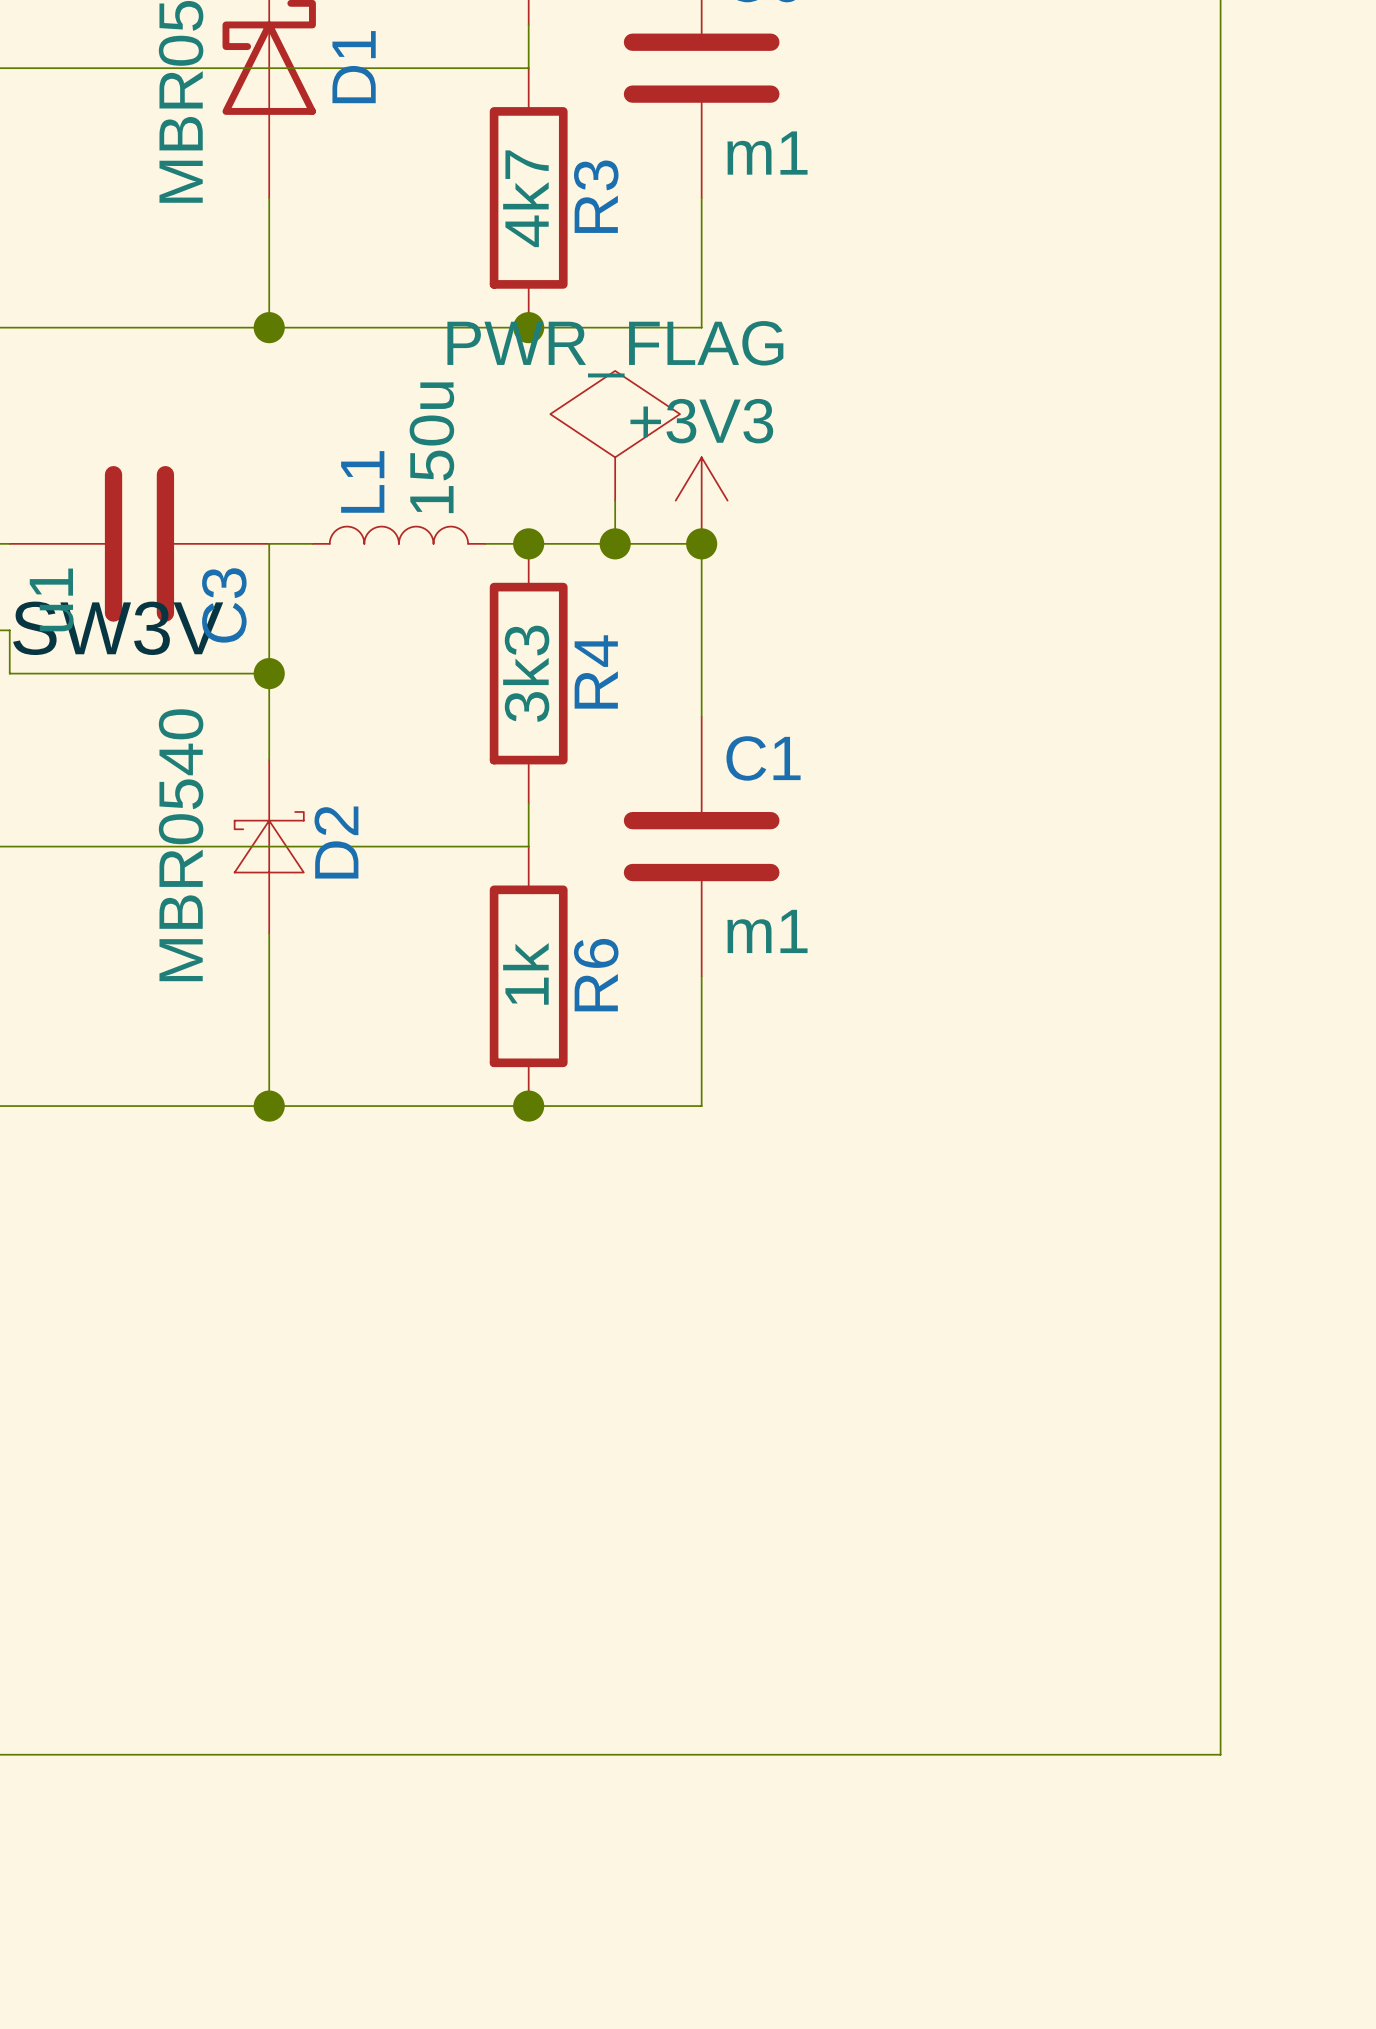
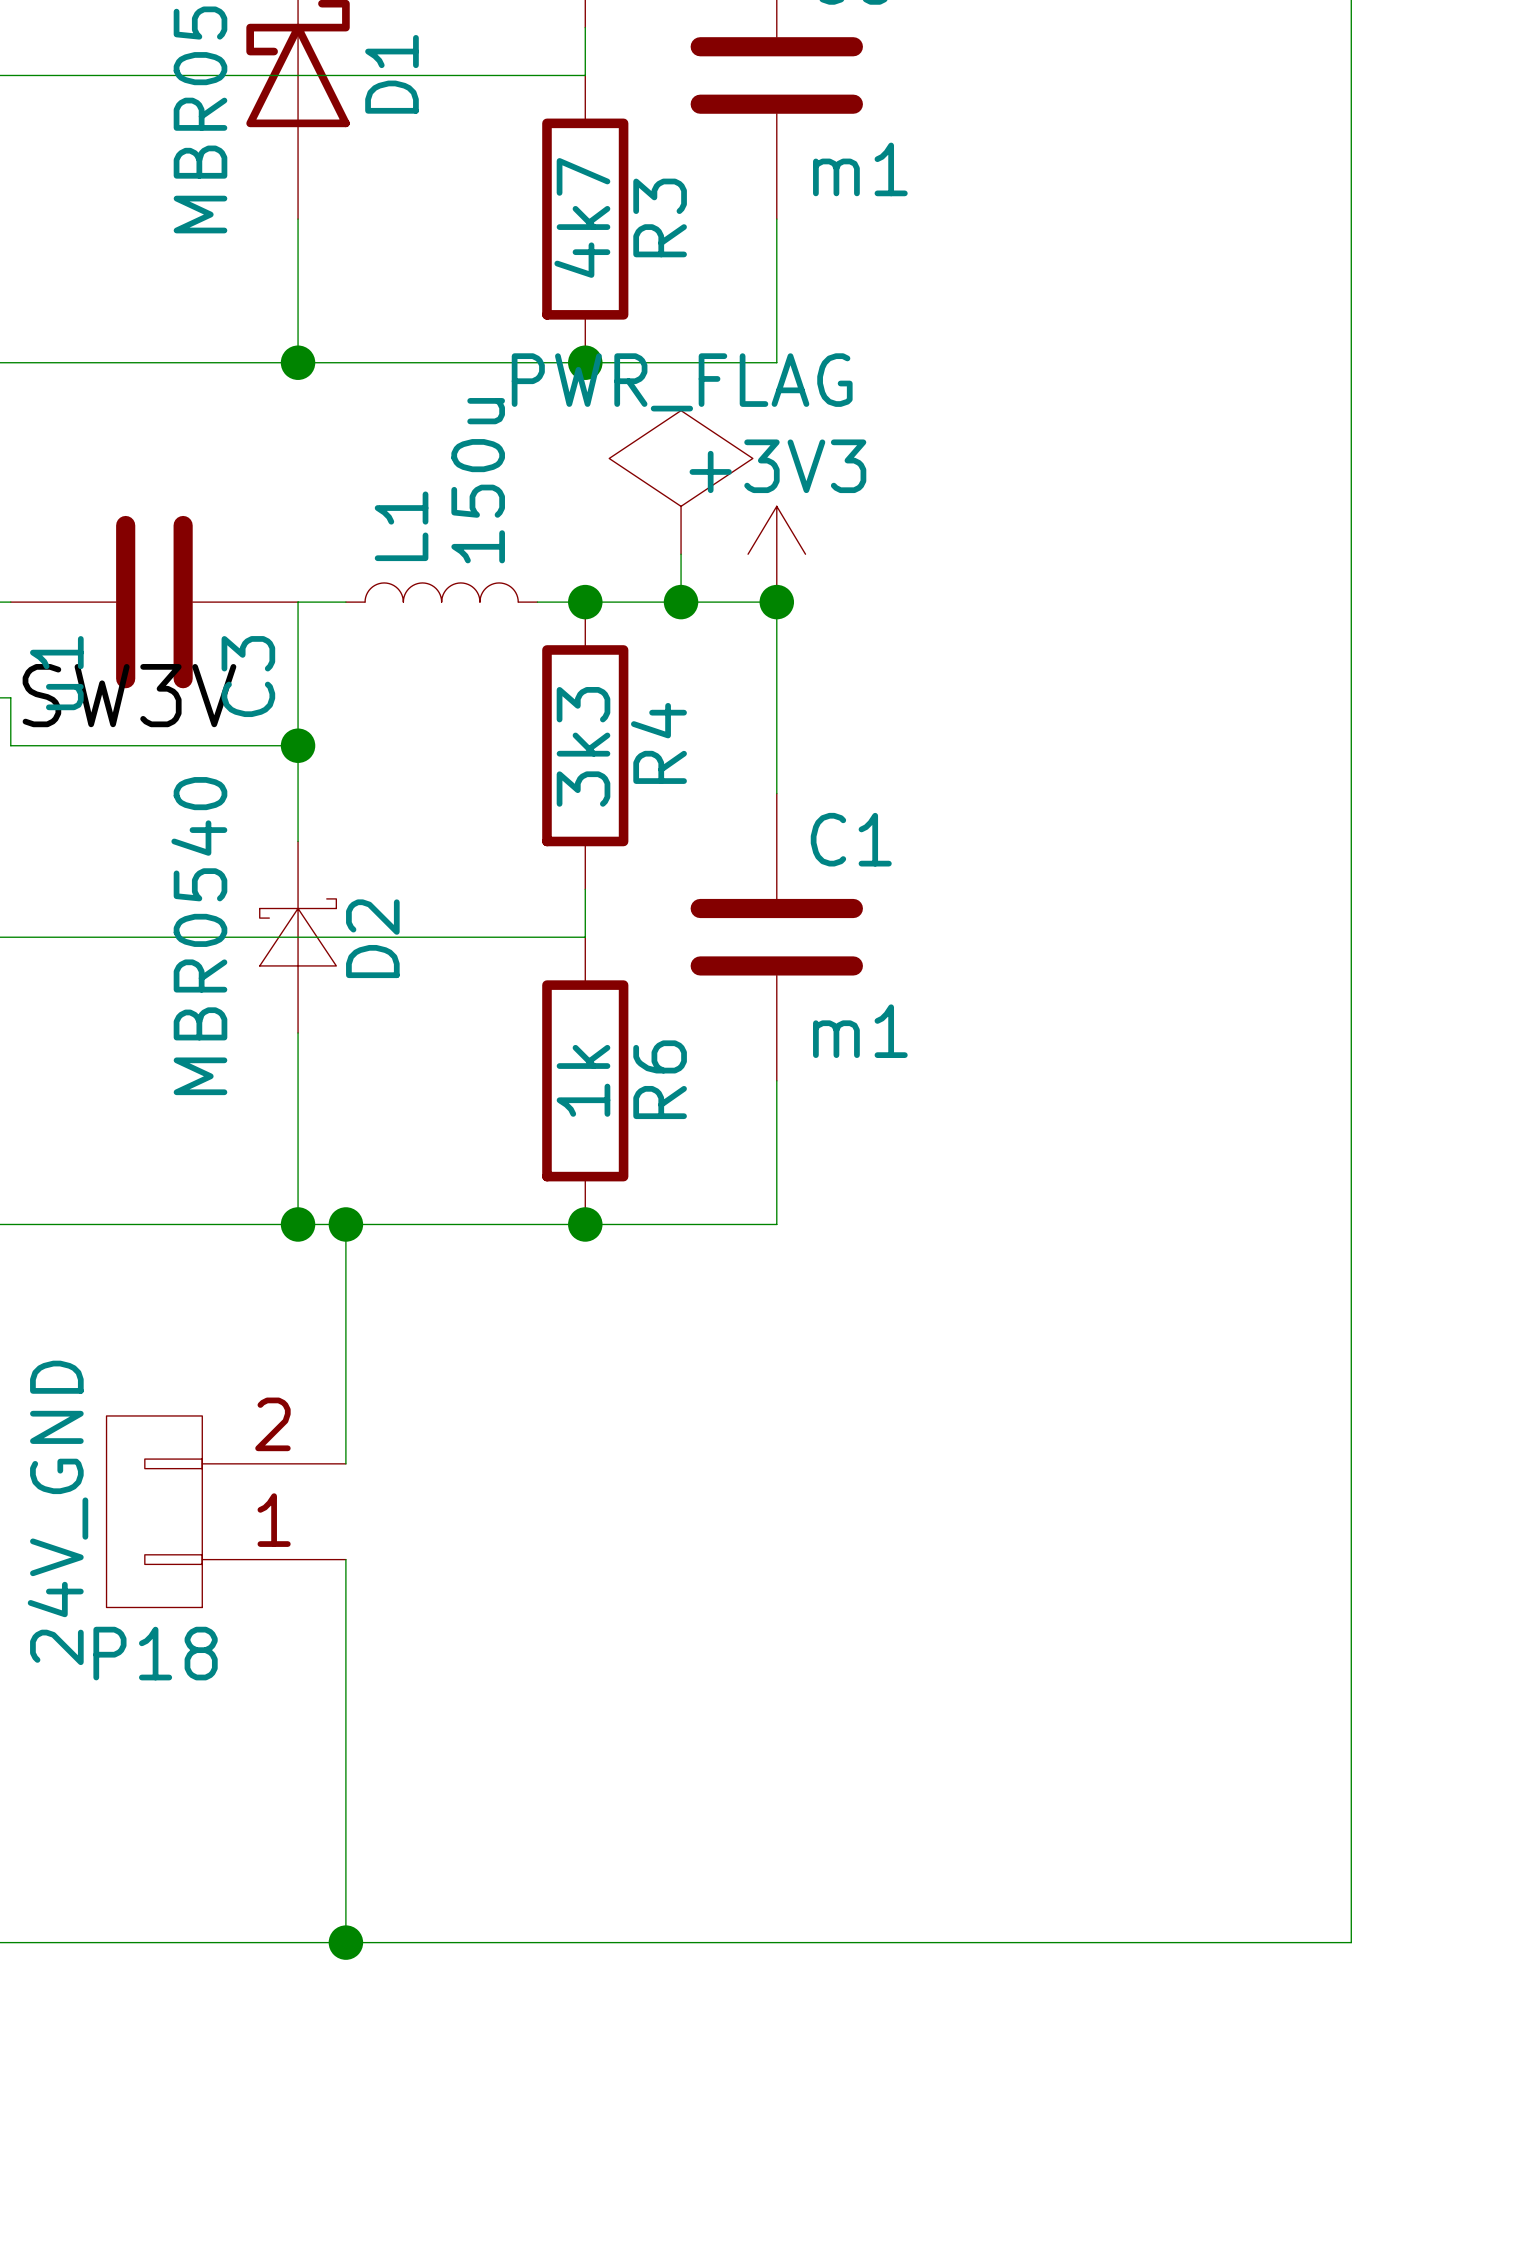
wire: none -> (345, 1224) (345, 1463)
junction: none -> (345, 1224)
P18: none -> 24V_GND (226, 1511)
wire: none -> (345, 1559) (345, 1942)
junction: none -> (345, 1942)

